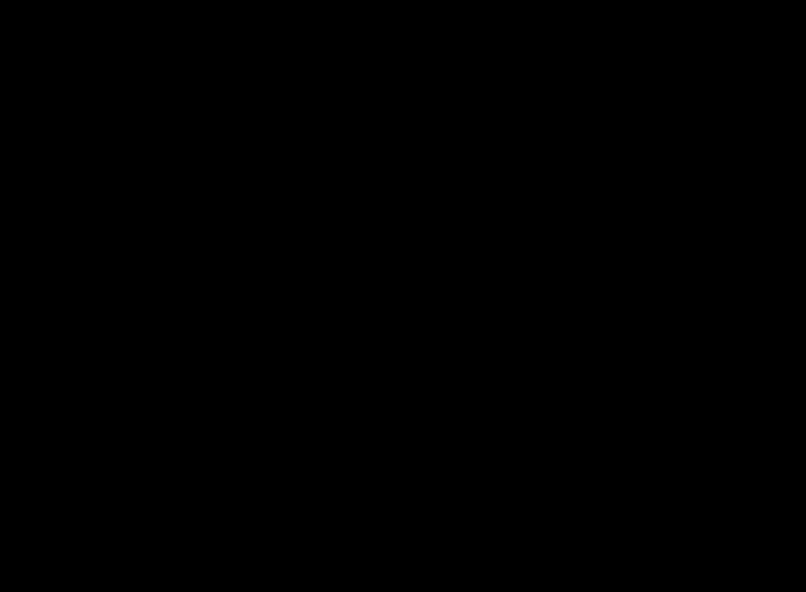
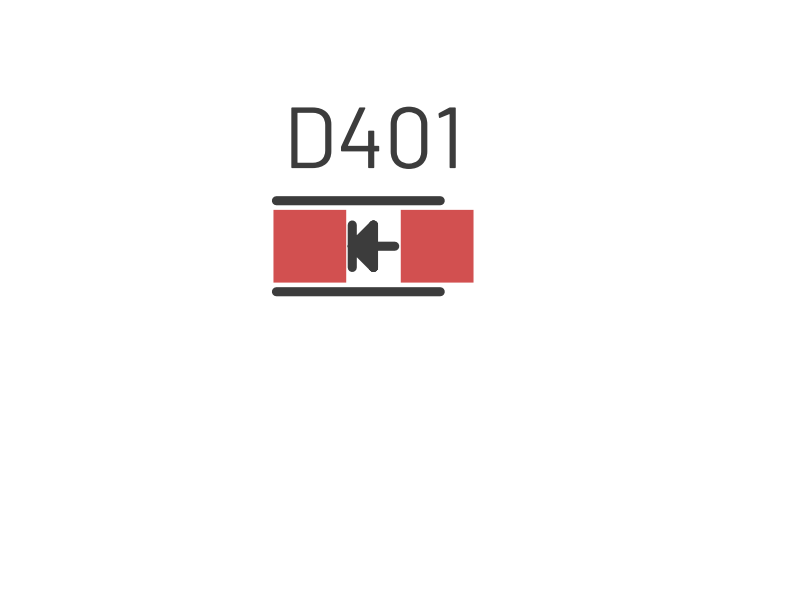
D401: none -> (372, 246)

